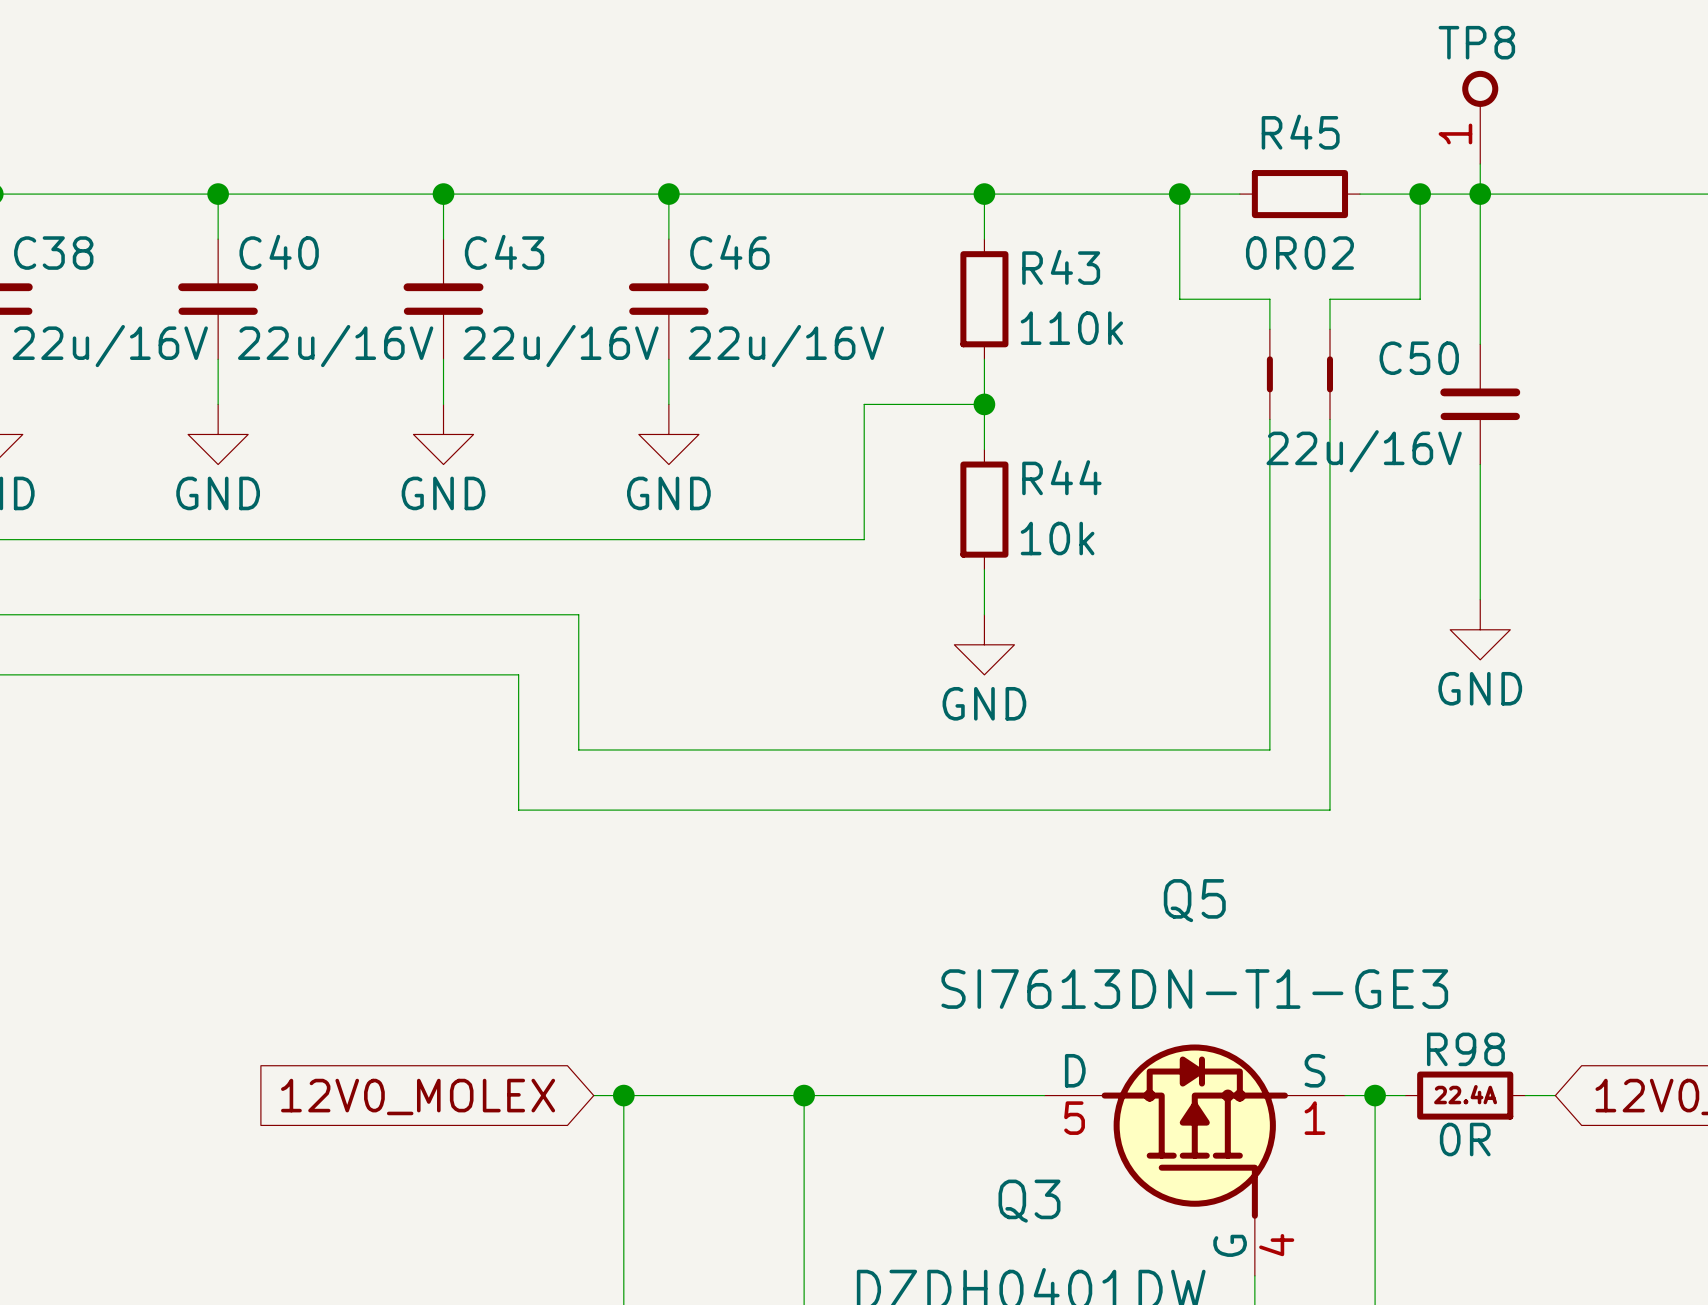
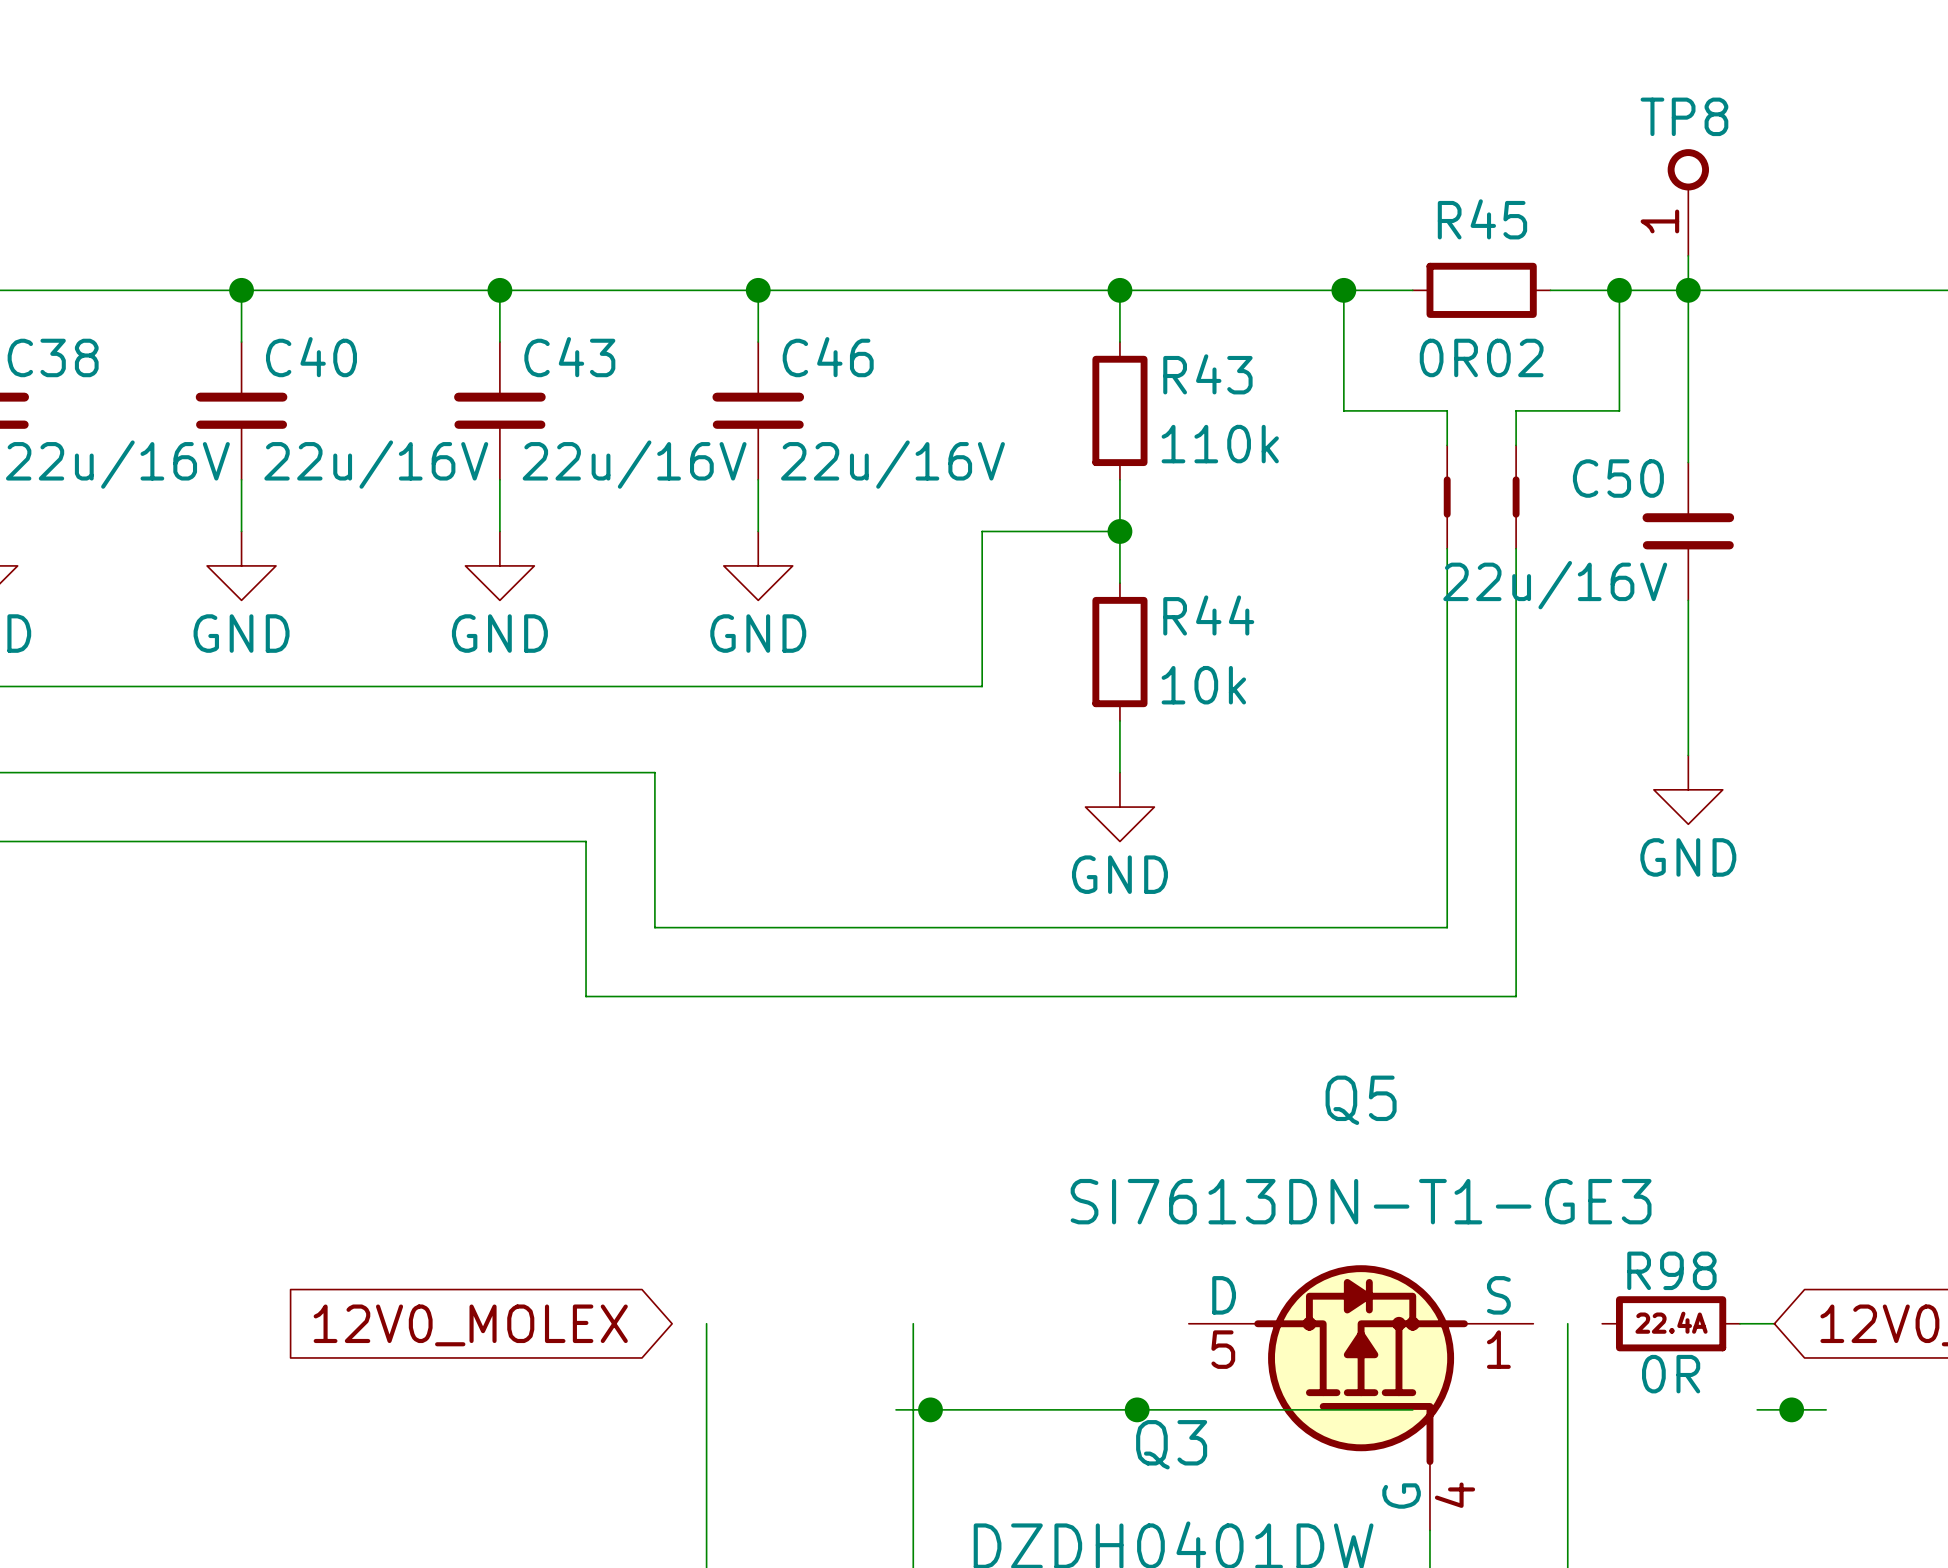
wire: (593, 1095) (1044, 1095) -> (896, 1409) (1412, 1409)
junction: (623, 1095) -> none
junction position: (804, 1095) -> (930, 1409)
wire: (1345, 1095) (1405, 1095) -> (1757, 1409) (1826, 1409)
junction: (1375, 1095) -> none
junction: none -> (1137, 1409)
junction: none -> (1791, 1409)

